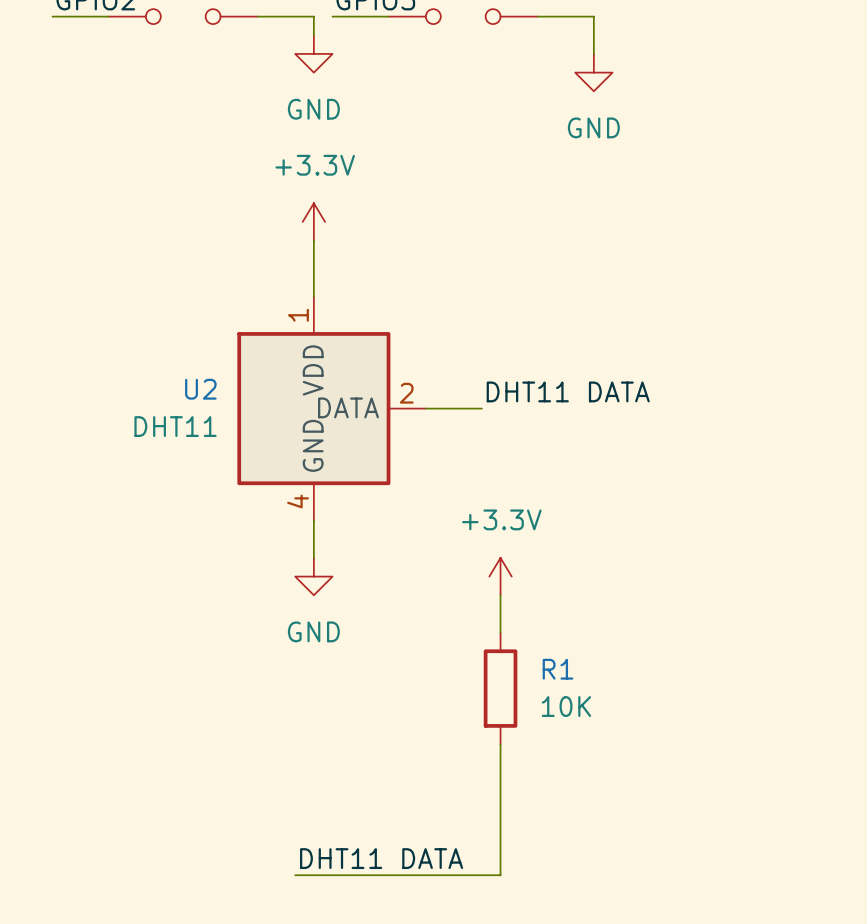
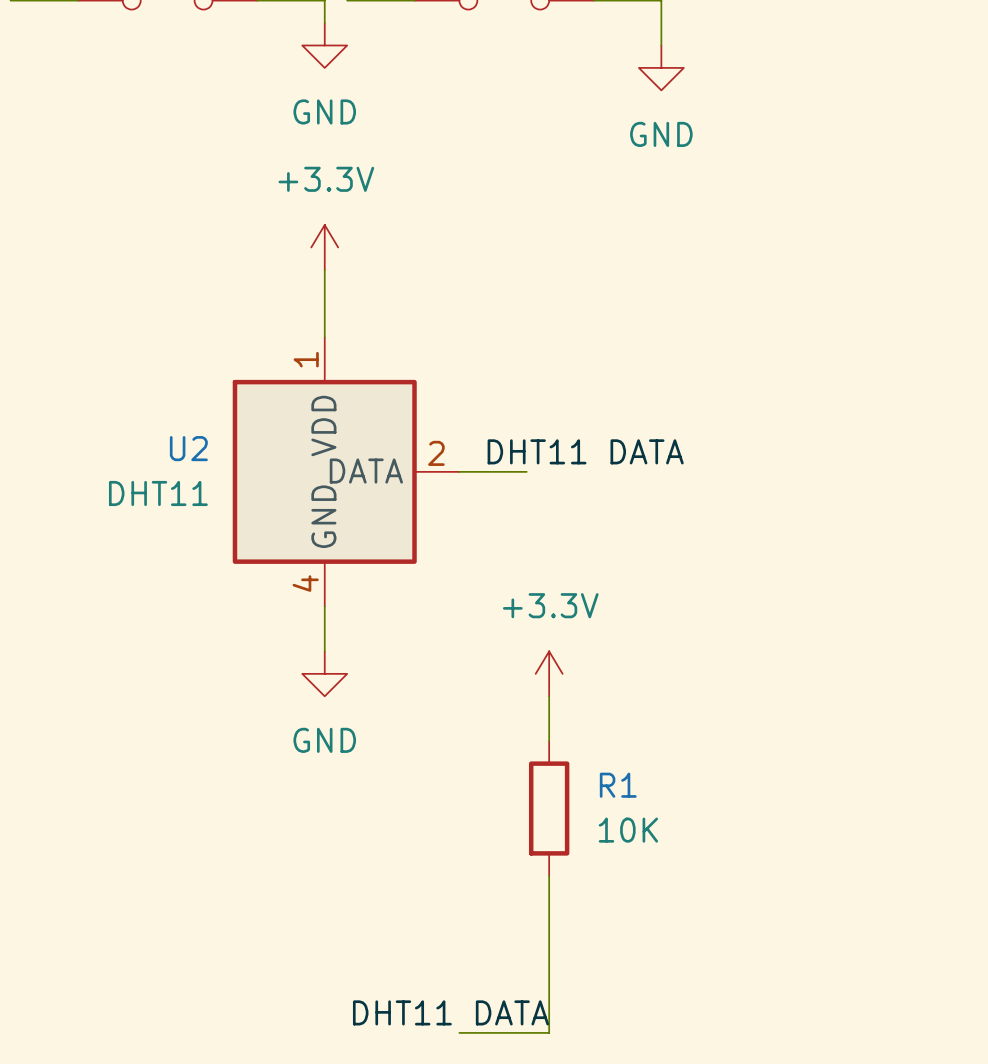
label position: DHT11 DATA (568, 391) -> DHT11 DATA (585, 451)
label position: DHT11 DATA (381, 858) -> DHT11 DATA (451, 1012)
wire: (295, 875) (425, 875) -> none

